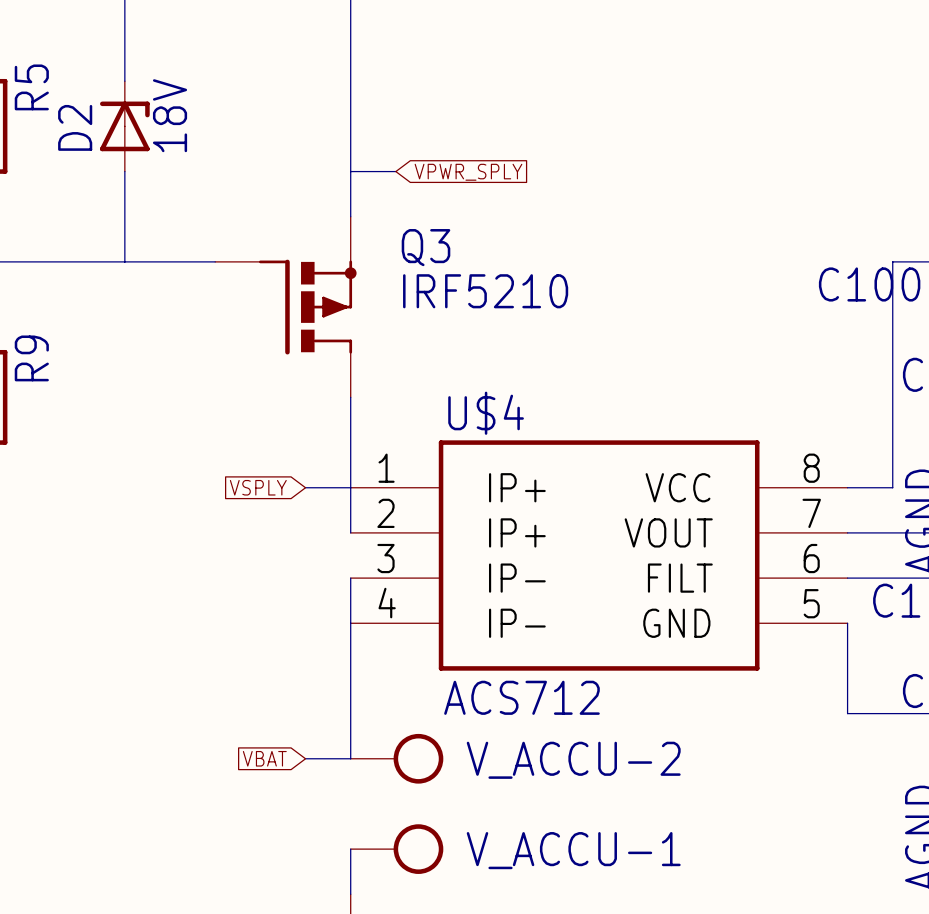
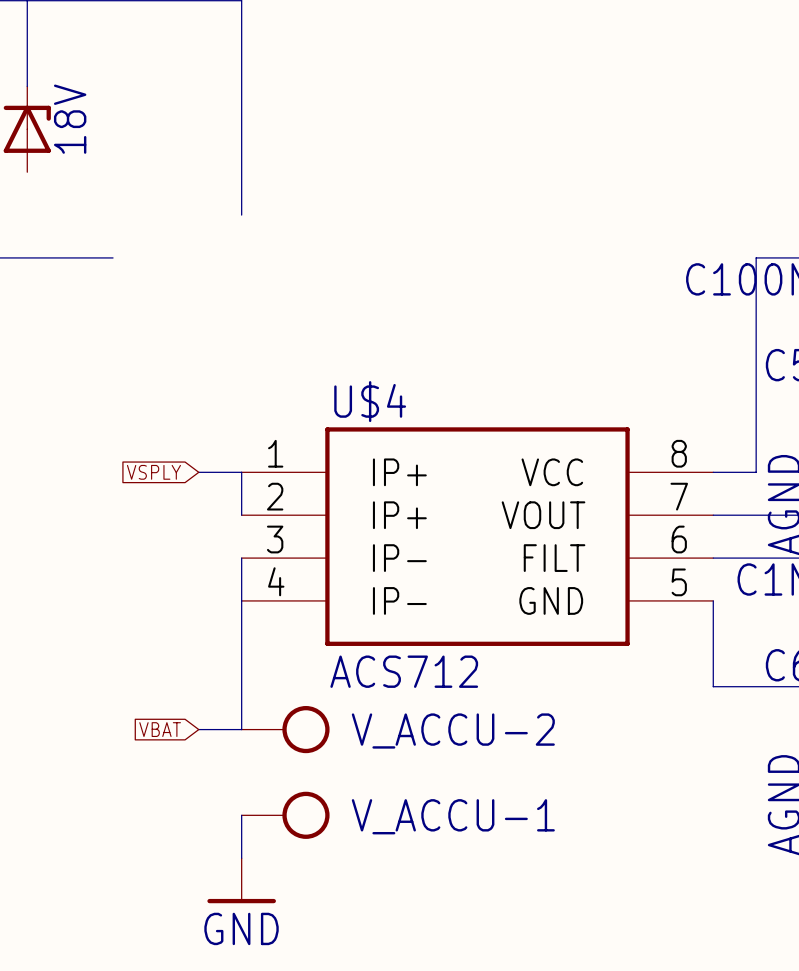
wire: (124, 171) (124, 261) -> none
wire: (350, 171) (395, 171) -> none
global label: VPWR_SPLY (468, 172) -> none
Q3: IRF5210 (285, 307) -> none
wire: (350, 397) (350, 487) -> none

